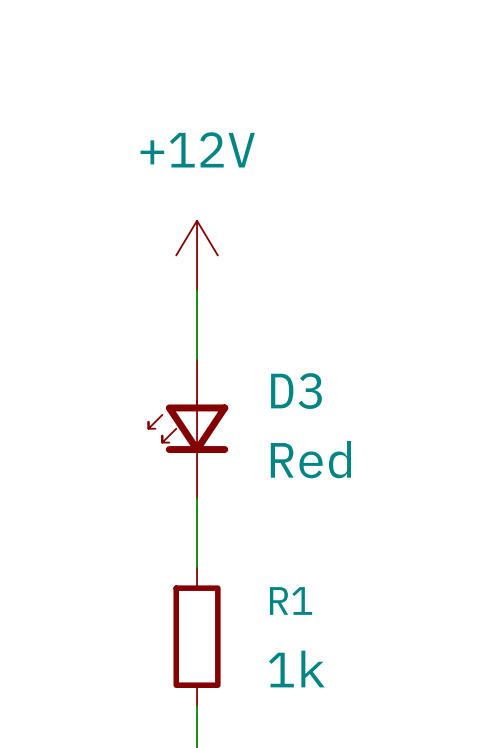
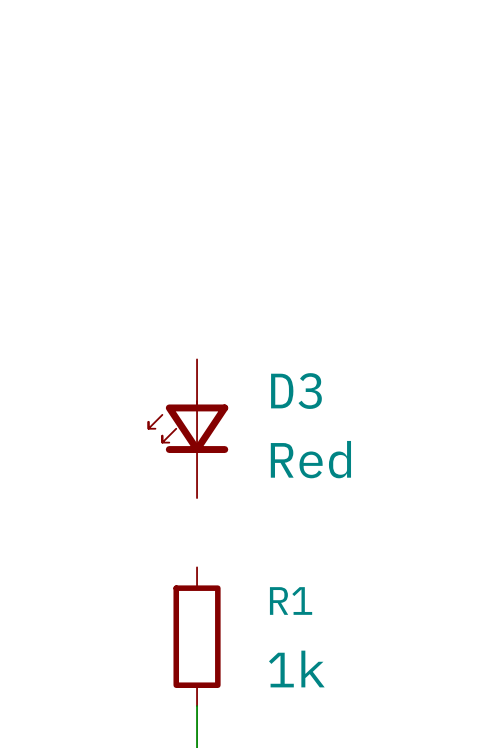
power symbol: +12V (197, 255) -> none
wire: (197, 290) (197, 359) -> none
wire: (197, 498) (197, 567) -> none

